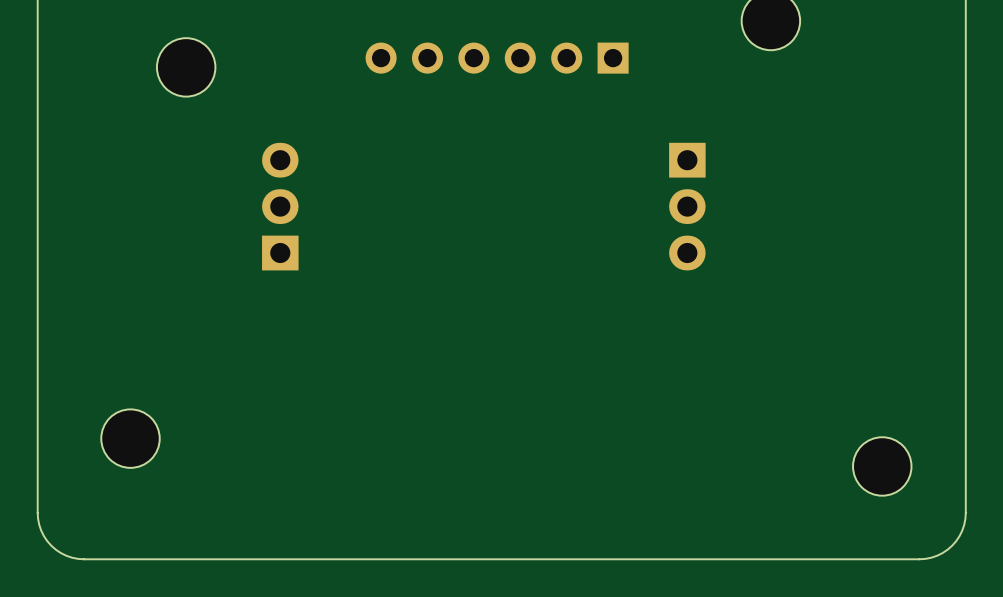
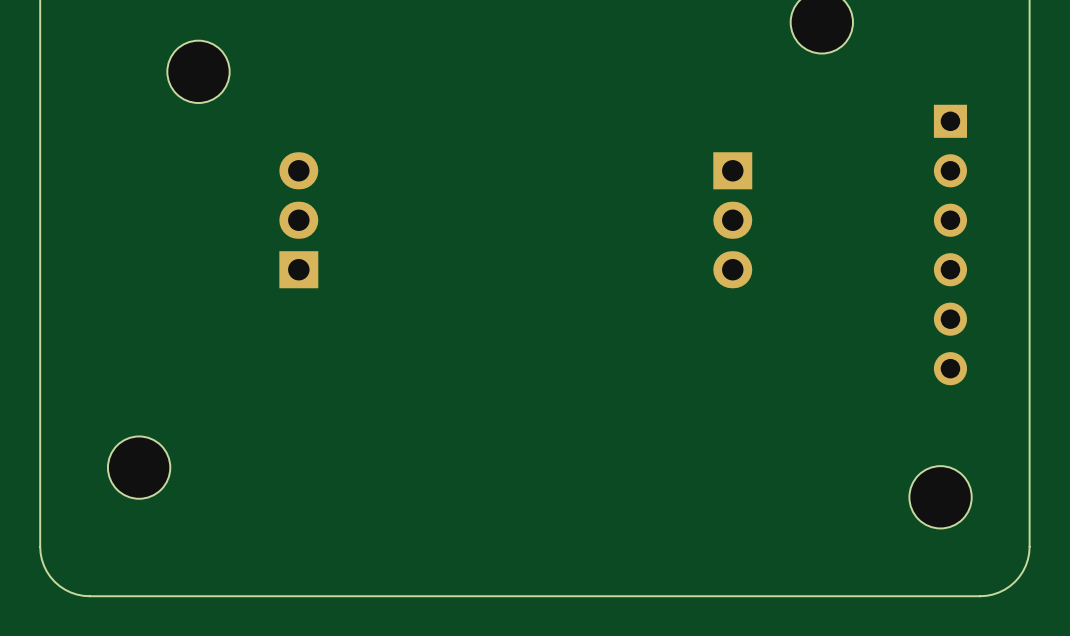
part rotation: 0° (497, 58) -> 90° counterclockwise (950, 244)
part position: (497, 58) -> (950, 244)

